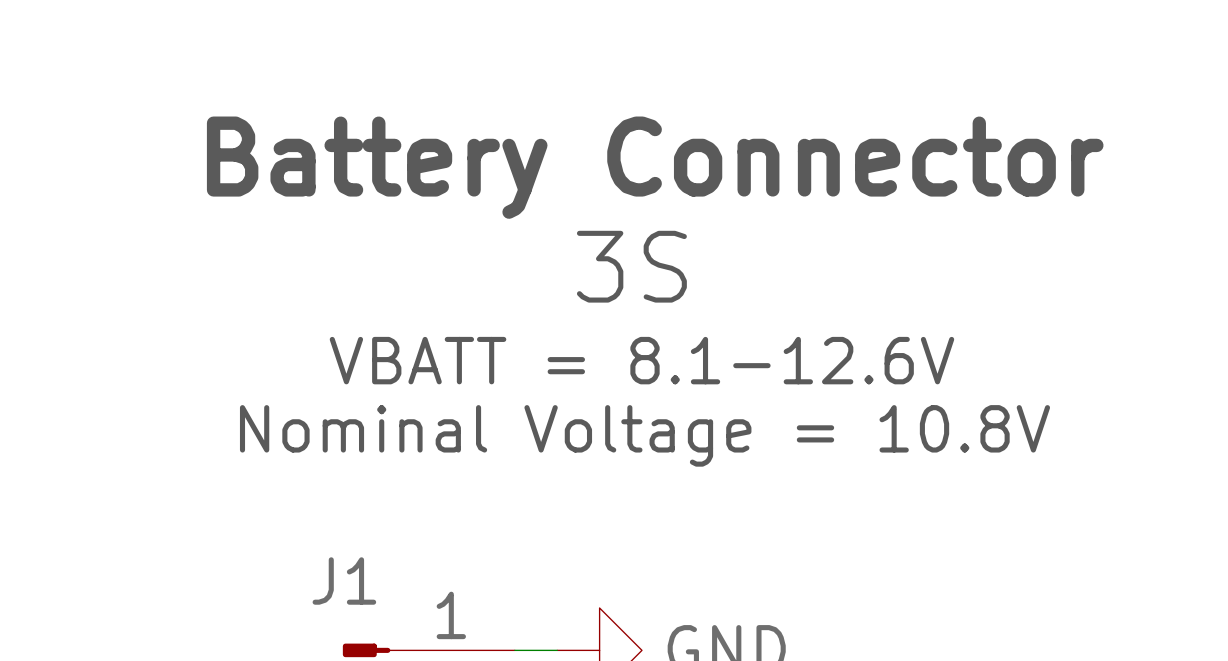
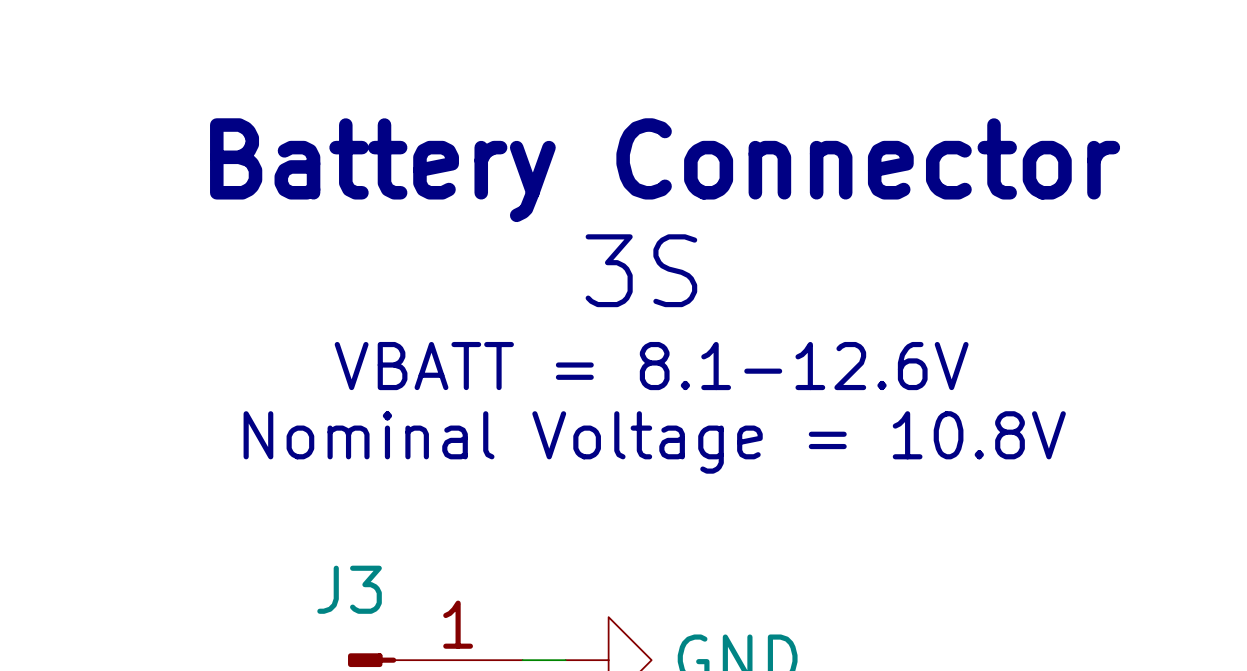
J1 name: J1 (344, 581) -> J3 (349, 589)

